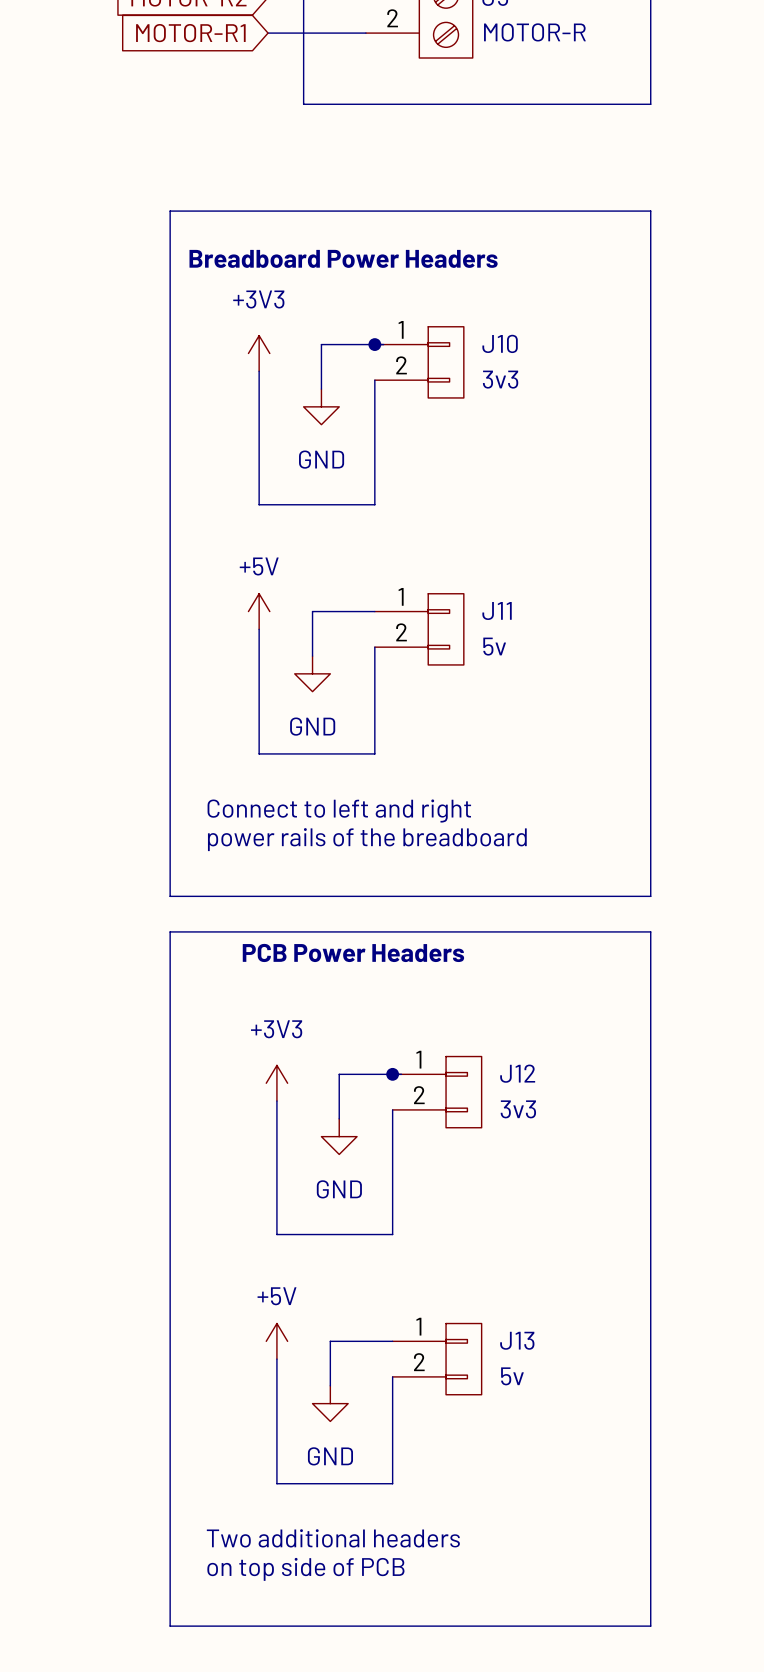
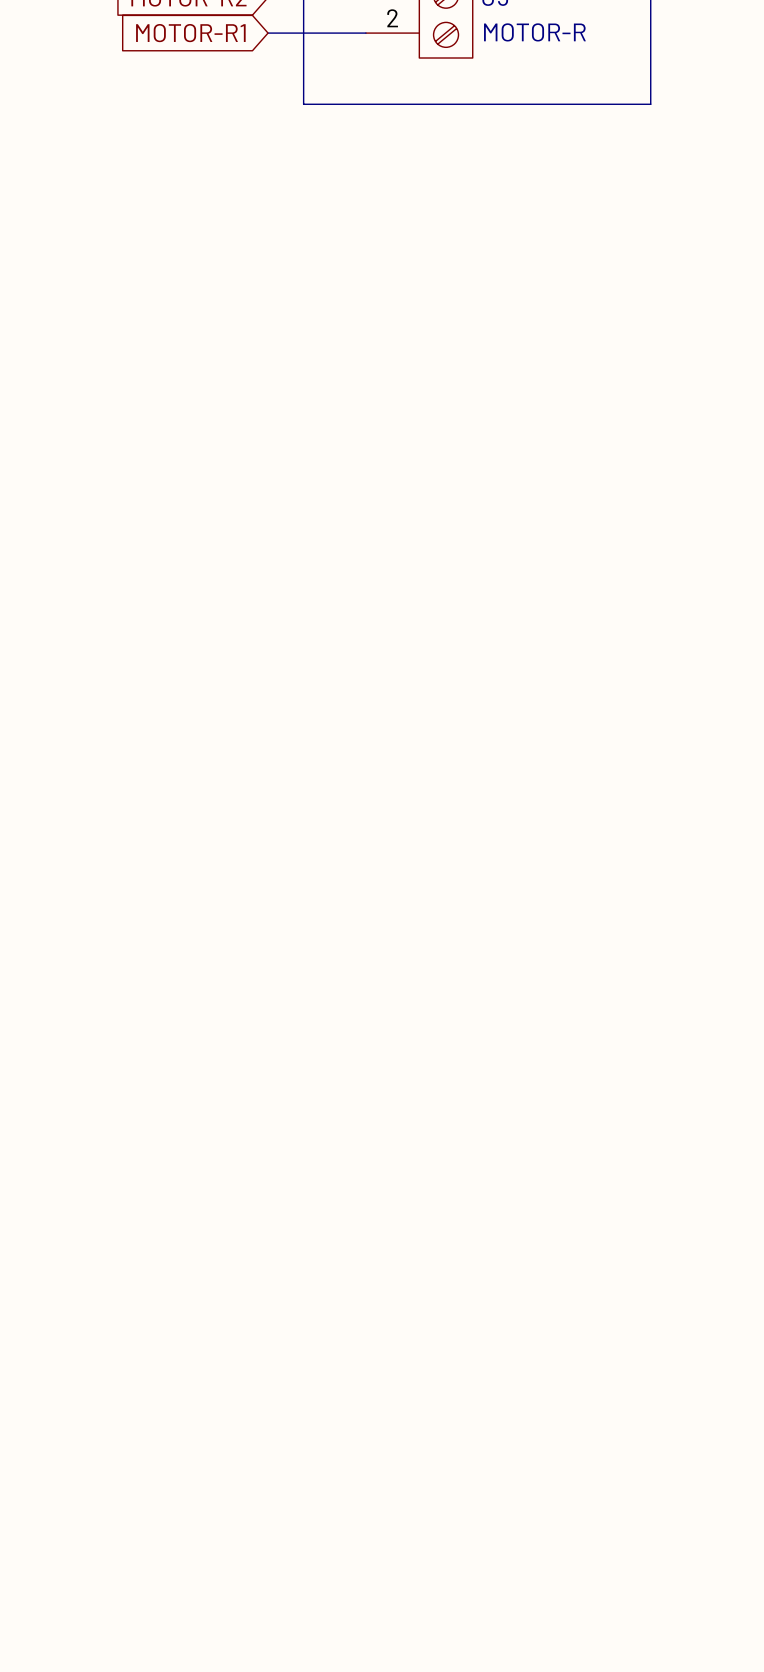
line: (170, 211) (170, 896) (650, 896) (650, 211) (170, 211) -> none
text: Breadboard Power Headers (343, 258) -> none
junction: (374, 344) -> none
wire: (383, 344) (321, 344) (321, 389) -> none
power symbol: +3V3 (259, 353) -> none
J10: 3v3 (419, 362) -> none
wire: (259, 371) (259, 504) (374, 504) (374, 380) -> none
power symbol: GND (321, 406) -> none
power symbol: +5V (259, 611) -> none
wire: (374, 611) (312, 611) (312, 656) -> none
wire: (259, 629) (259, 753) (374, 753) (374, 647) -> none
J11: 5v (419, 629) -> none
power symbol: GND (312, 673) -> none
text: Connect to left and right (339, 811) -> none
text: power rails of the breadboard (367, 839) -> none
line: (170, 931) (650, 931) (650, 1626) (170, 1626) (170, 931) -> none
text: PCB Power Headers (353, 952) -> none
junction: (392, 1074) -> none
wire: (401, 1074) (339, 1074) (339, 1118) -> none
power symbol: +3V3 (276, 1083) -> none
J12: 3v3 (437, 1092) -> none
wire: (276, 1101) (276, 1234) (392, 1234) (392, 1109) -> none
power symbol: GND (339, 1136) -> none
power symbol: +5V (276, 1341) -> none
wire: (392, 1341) (330, 1341) (330, 1385) -> none
wire: (276, 1359) (276, 1483) (392, 1483) (392, 1376) -> none
J13: 5v (437, 1359) -> none
power symbol: GND (330, 1403) -> none
text: Two additional headers (333, 1538) -> none
text: on top side of PCB (305, 1569) -> none

